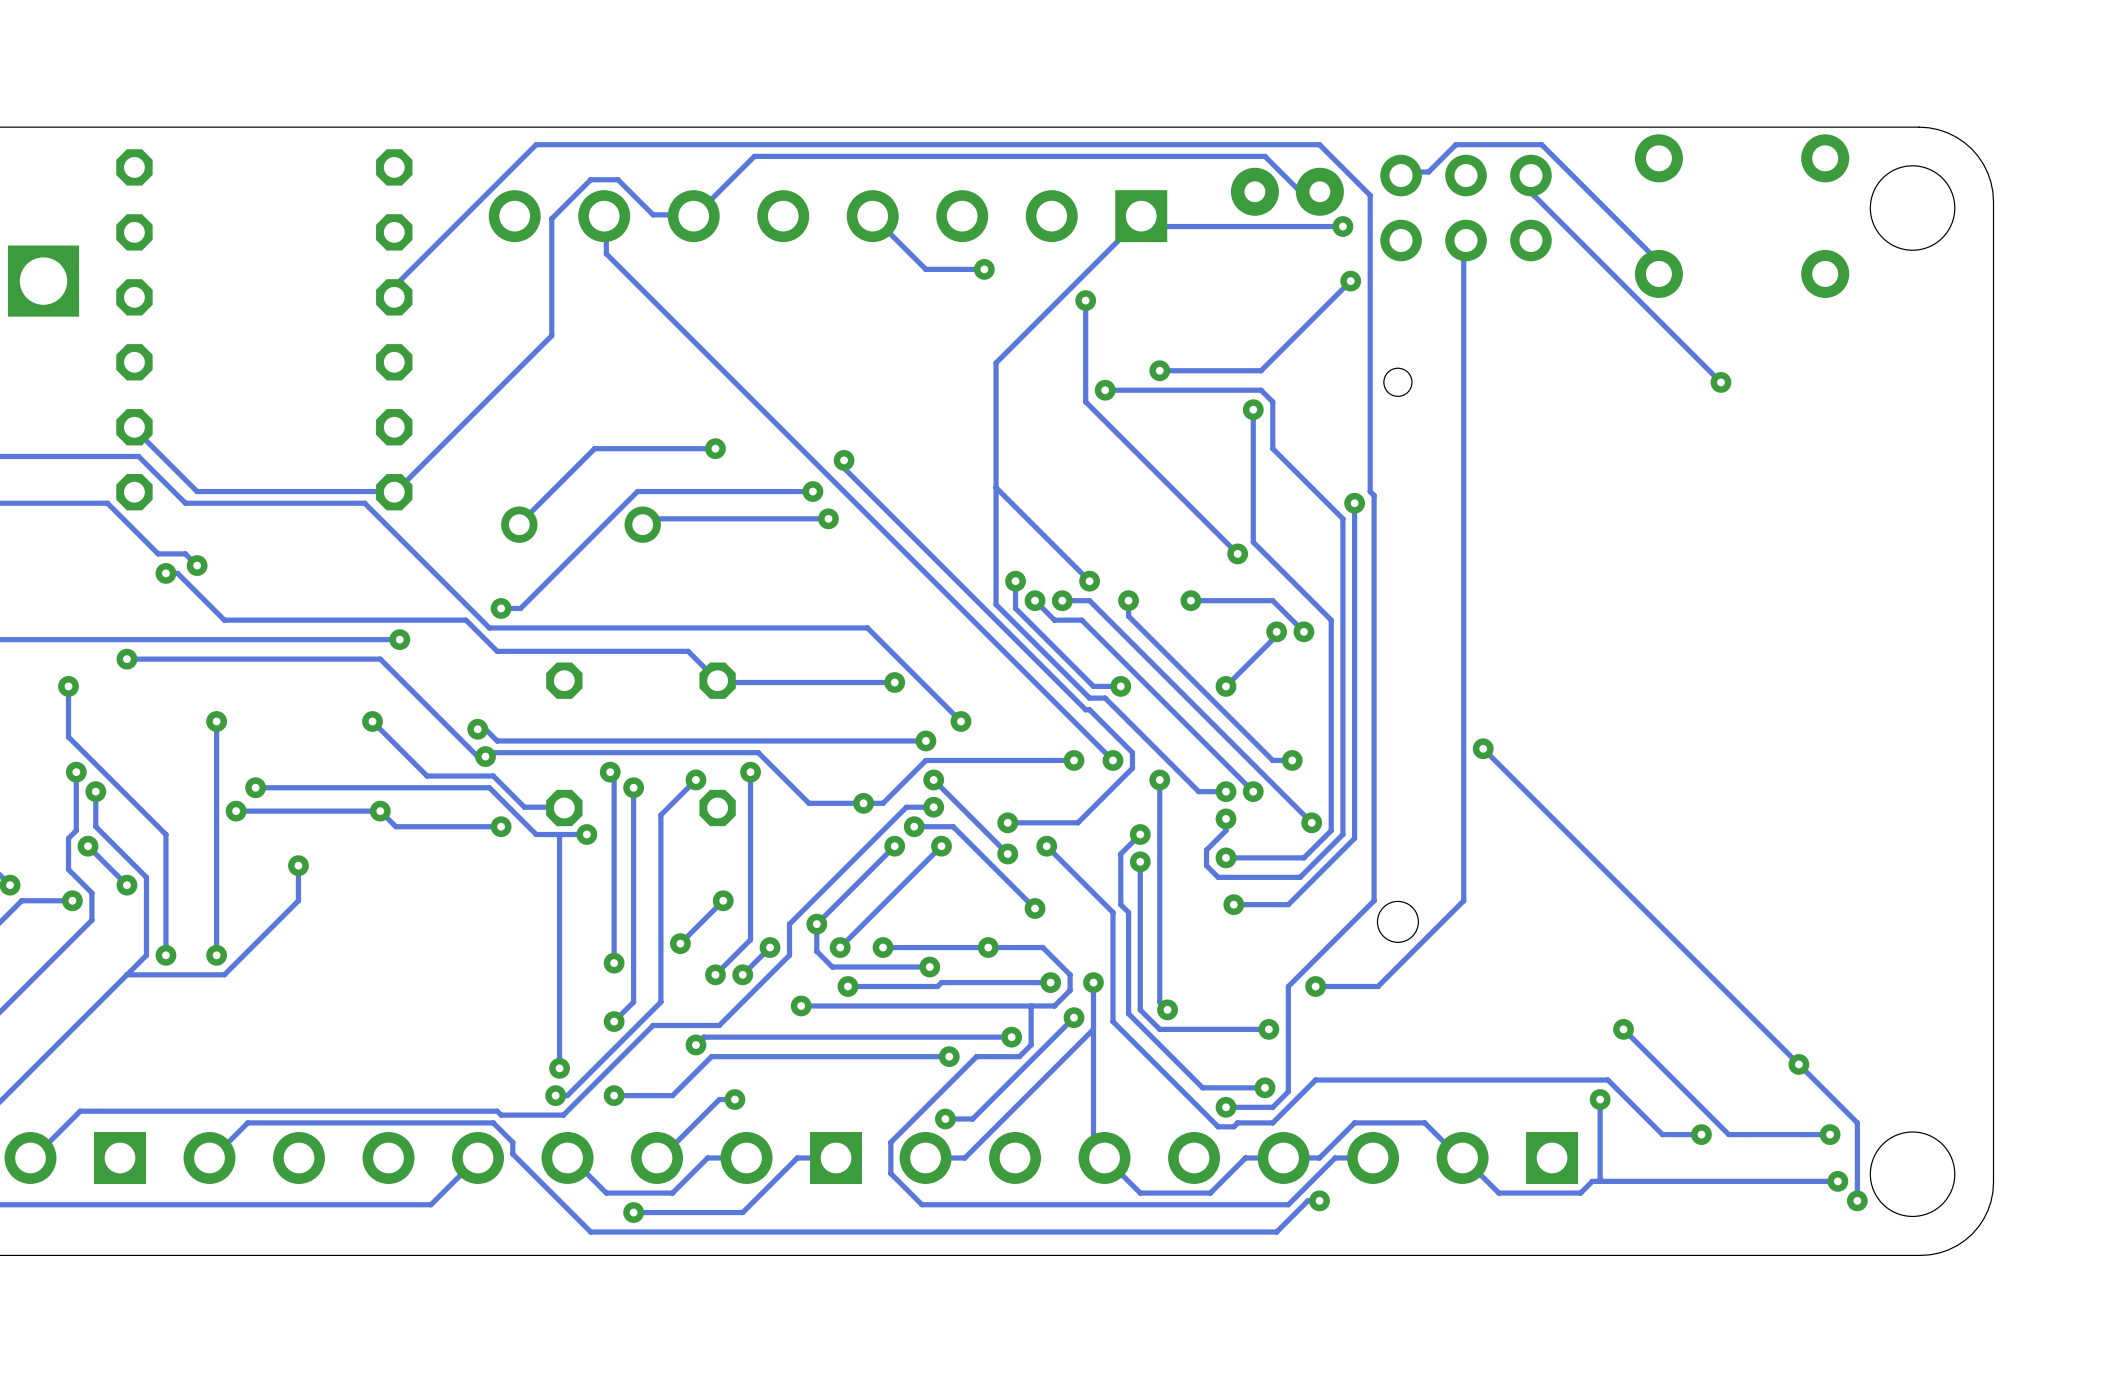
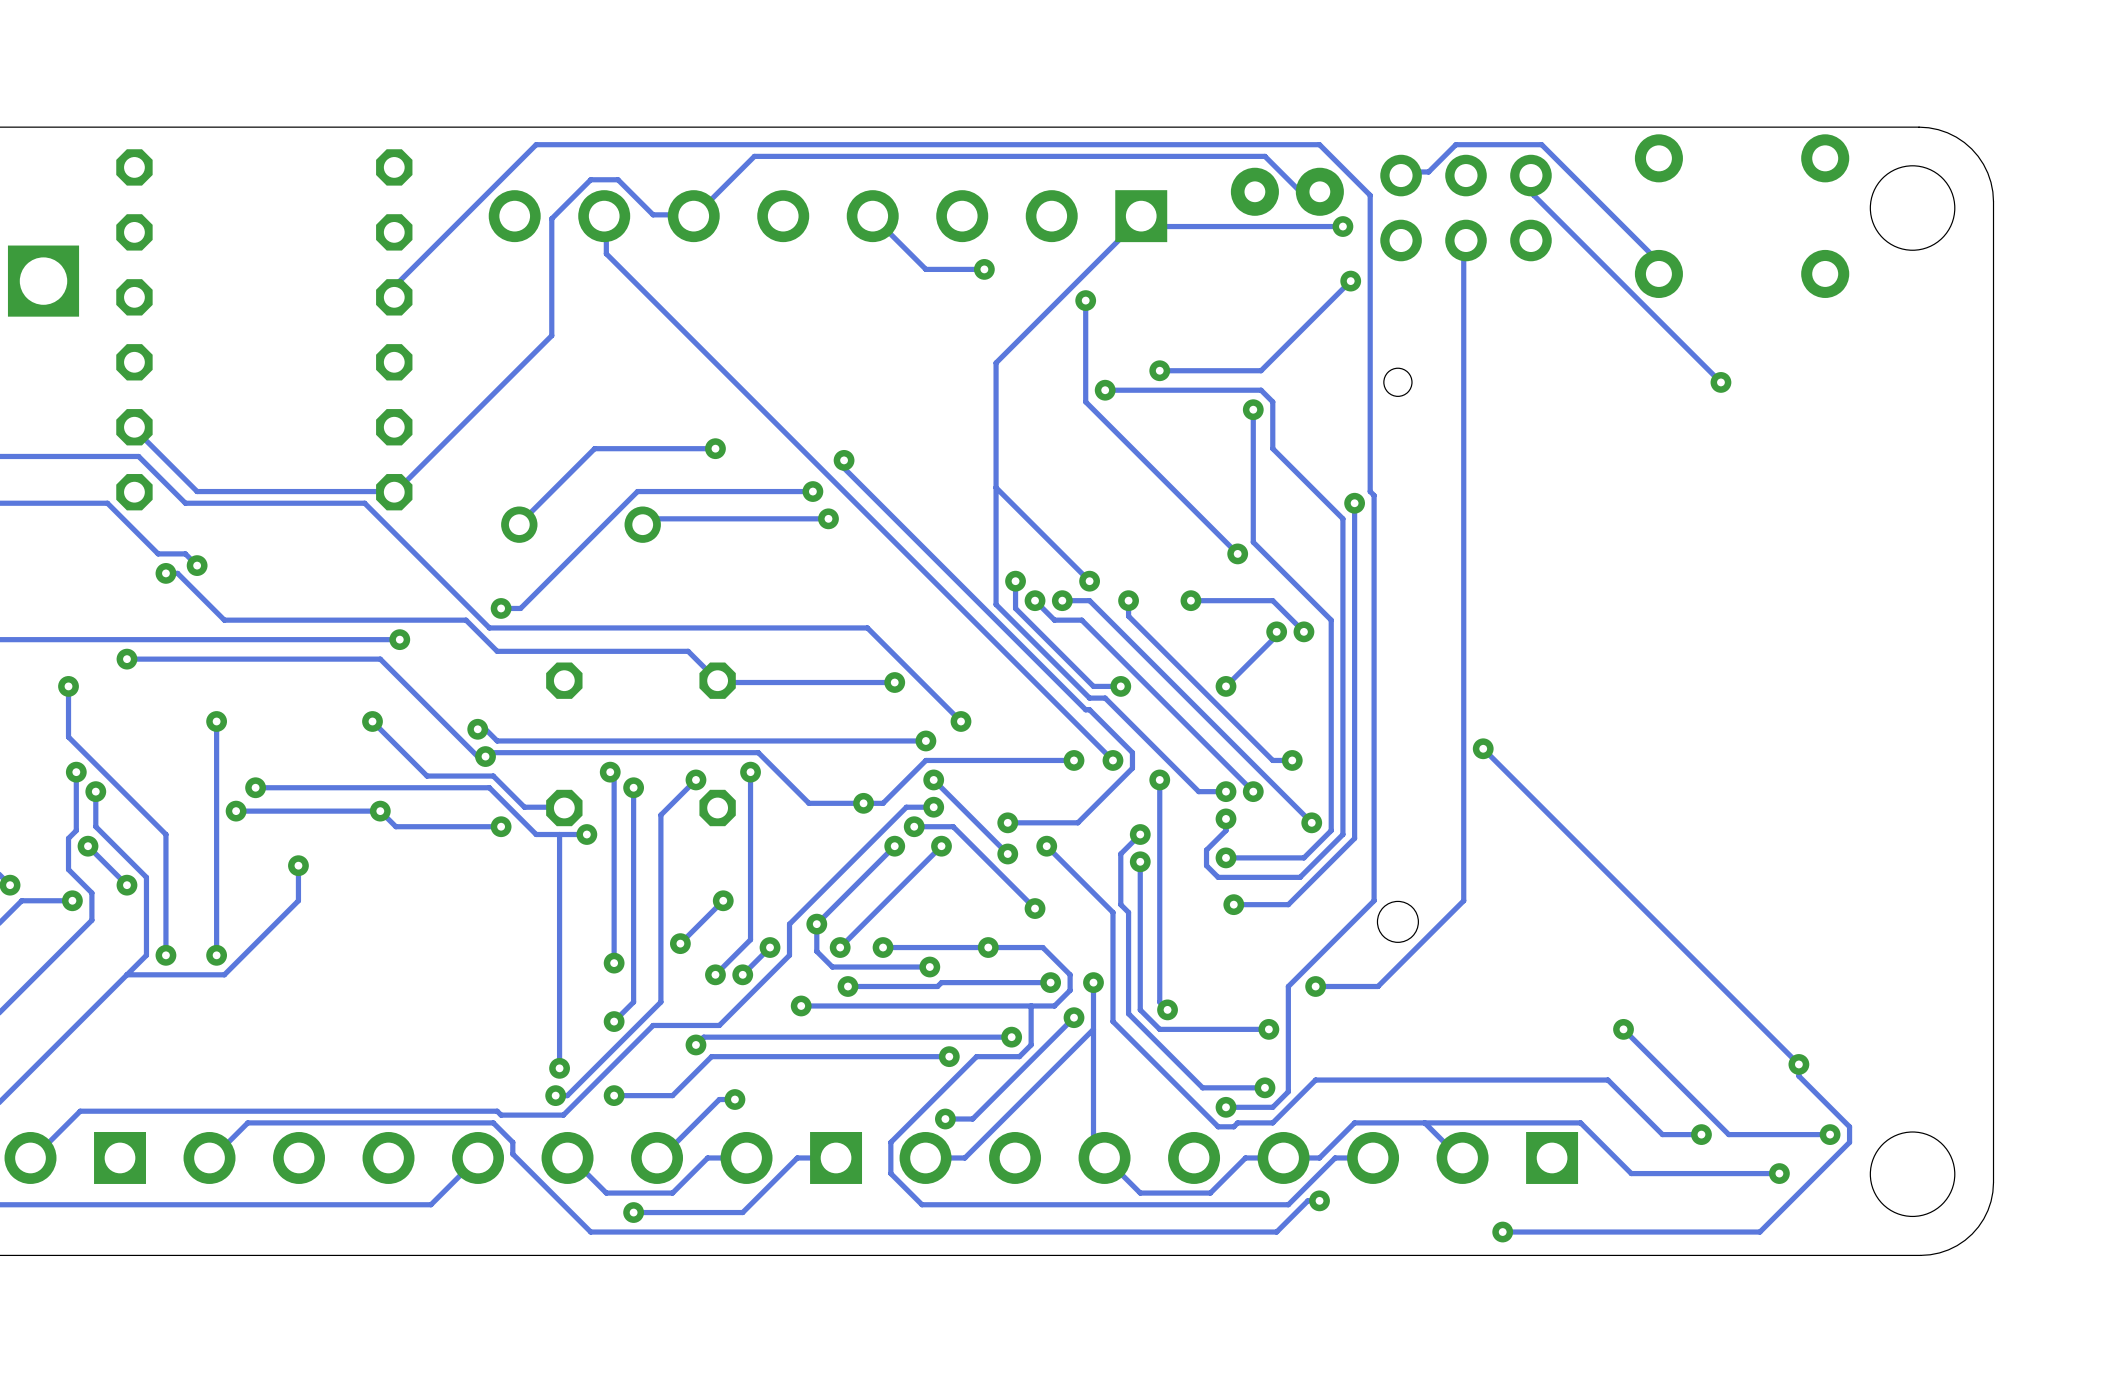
track: (1798, 1064) (1857, 1122) (1857, 1200) -> (1798, 1064) (1798, 1076) (1849, 1126) (1849, 1142) (1759, 1232) (1502, 1232)
track: (1600, 1099) (1600, 1181) -> none
via: (1600, 1099) -> none
track: none -> (1424, 1122) (1580, 1122) (1631, 1173) (1779, 1173)
track: (1462, 1157) (1498, 1193) (1580, 1193) (1592, 1181) (1837, 1181) -> none
via: none -> (1779, 1173)
via: (1837, 1181) -> none
via: (1857, 1200) -> none
via: none -> (1502, 1232)

